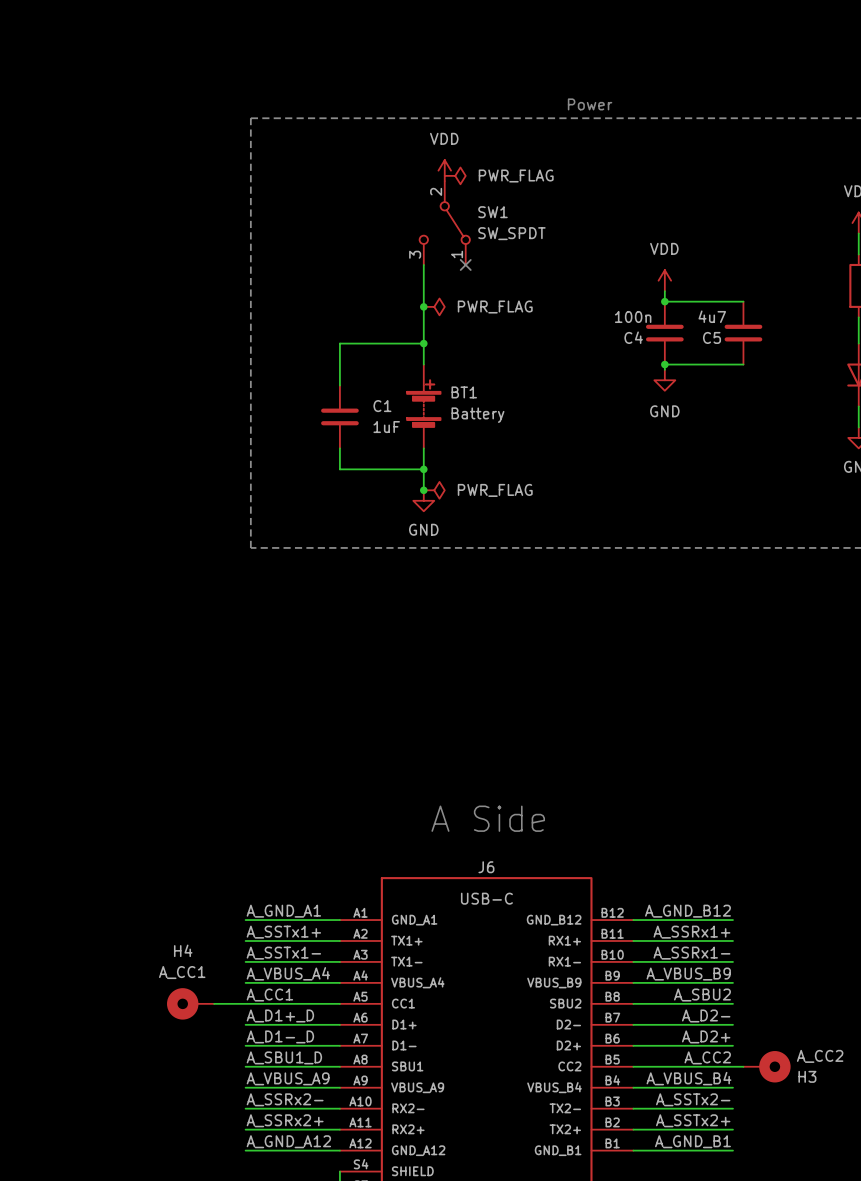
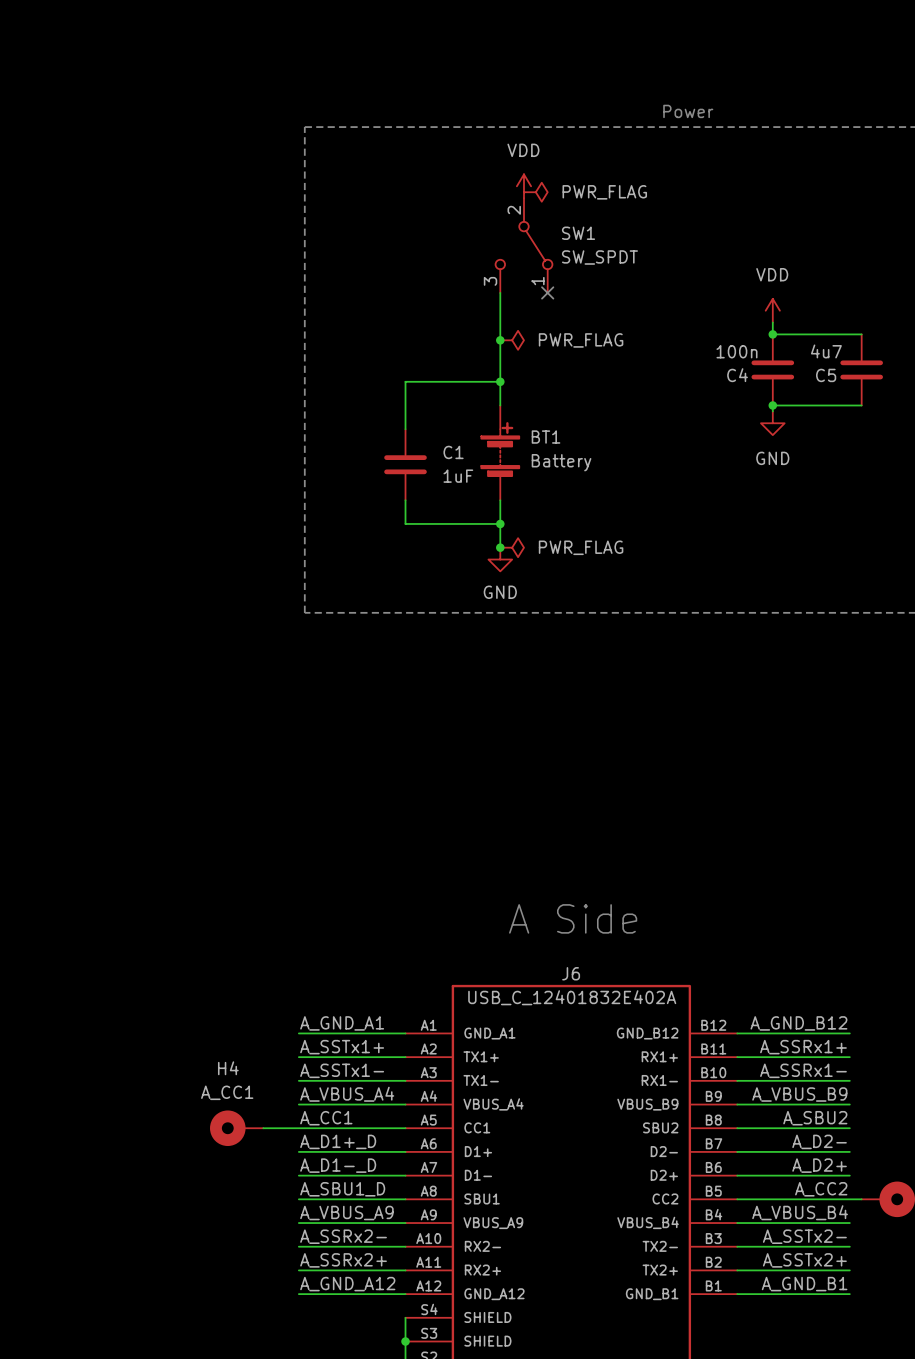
J6 value: USB-C (486, 898) -> USB_C_12401832E402A (572, 997)

